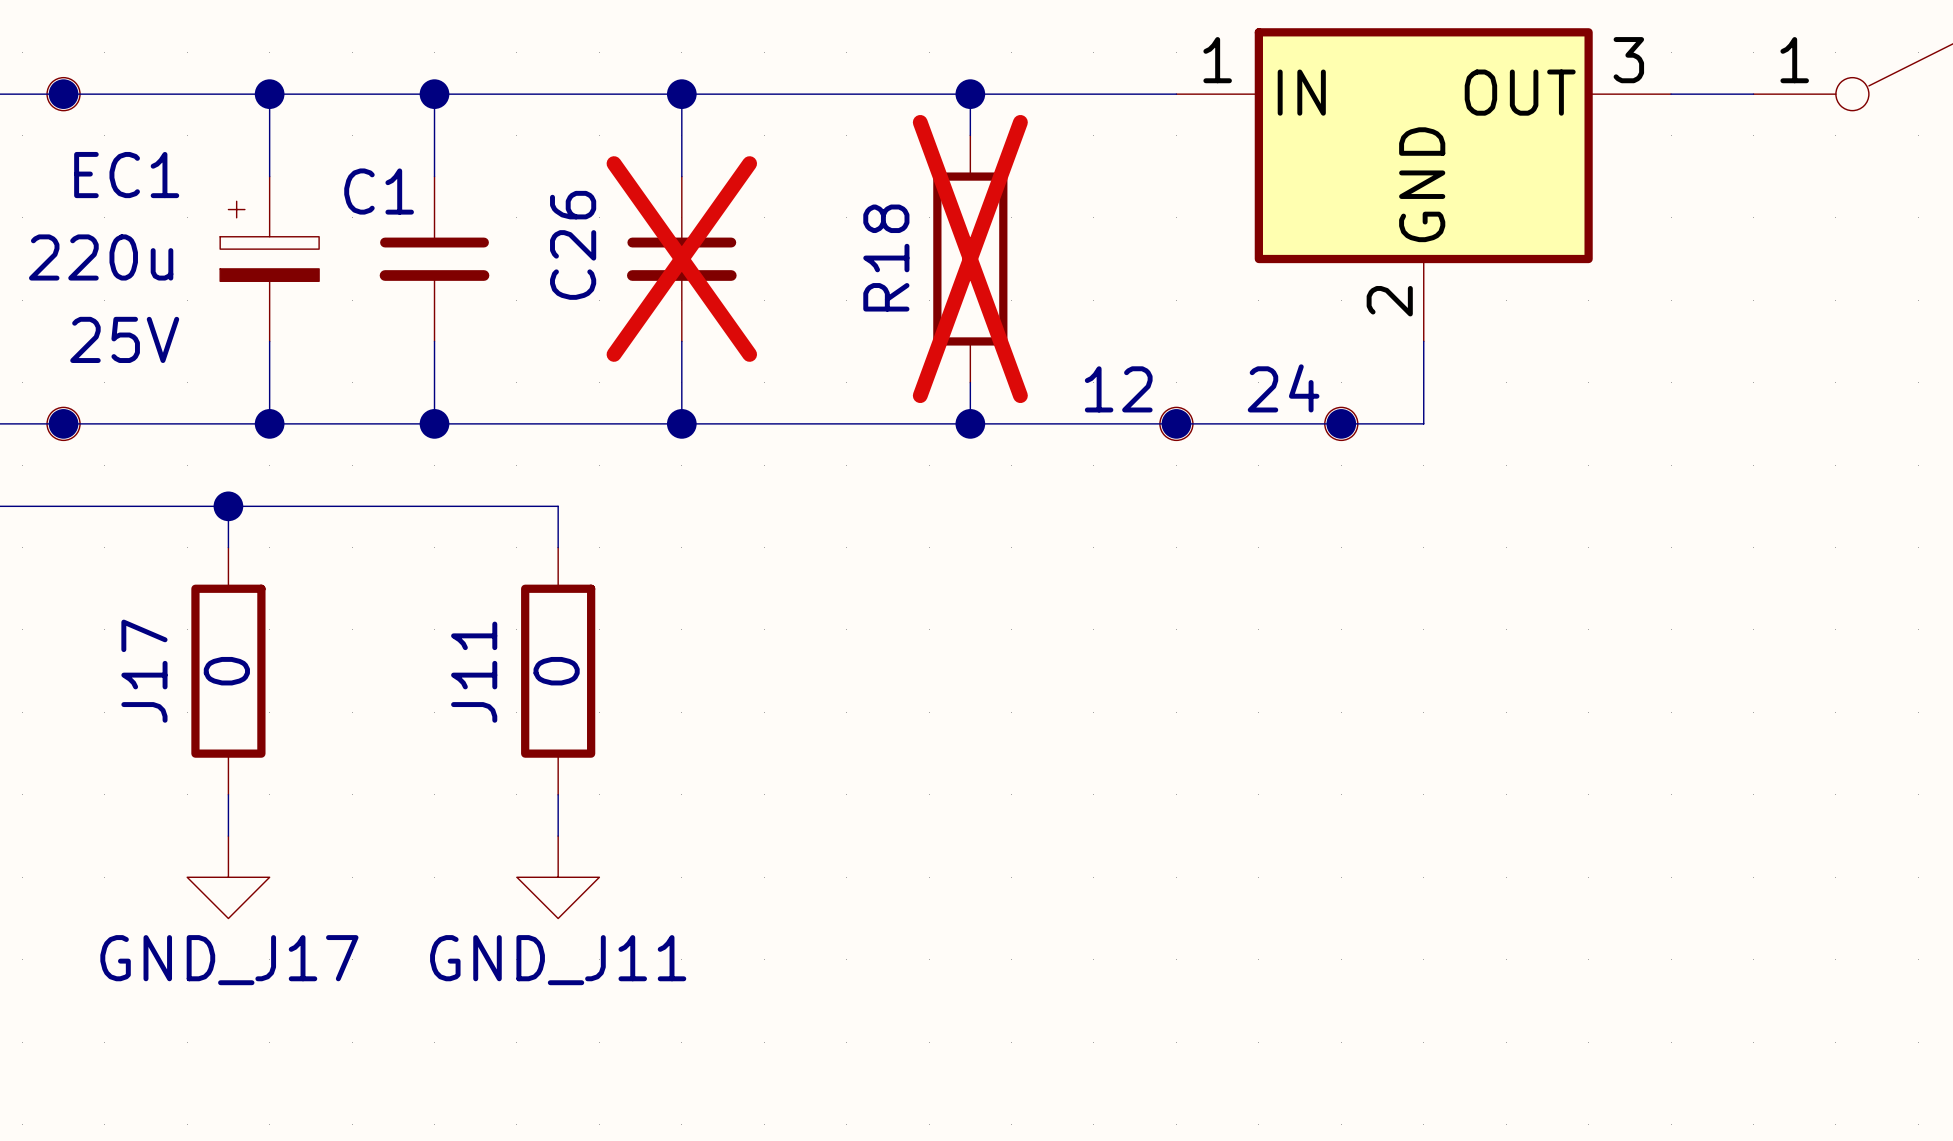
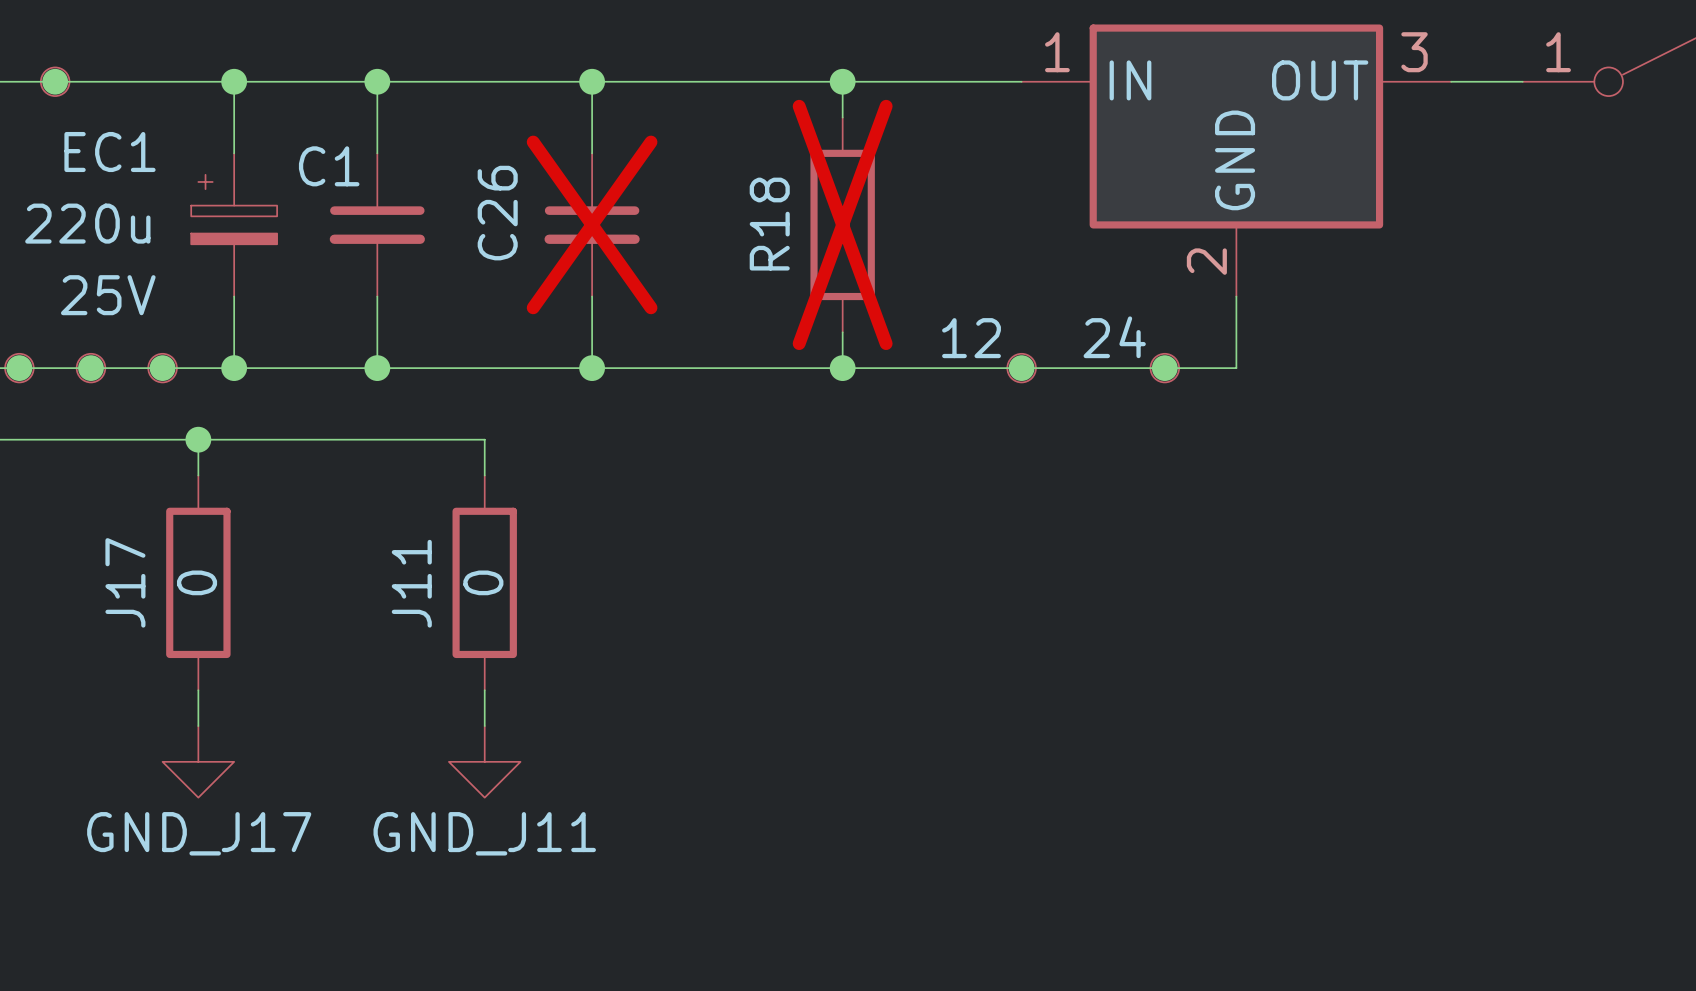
junction: none -> (19, 368)
part: none -> (19, 368)
junction: (63, 423) -> none
part: (63, 423) -> none
junction: none -> (90, 368)
part: none -> (90, 368)
junction: none -> (162, 368)
part: none -> (162, 368)

